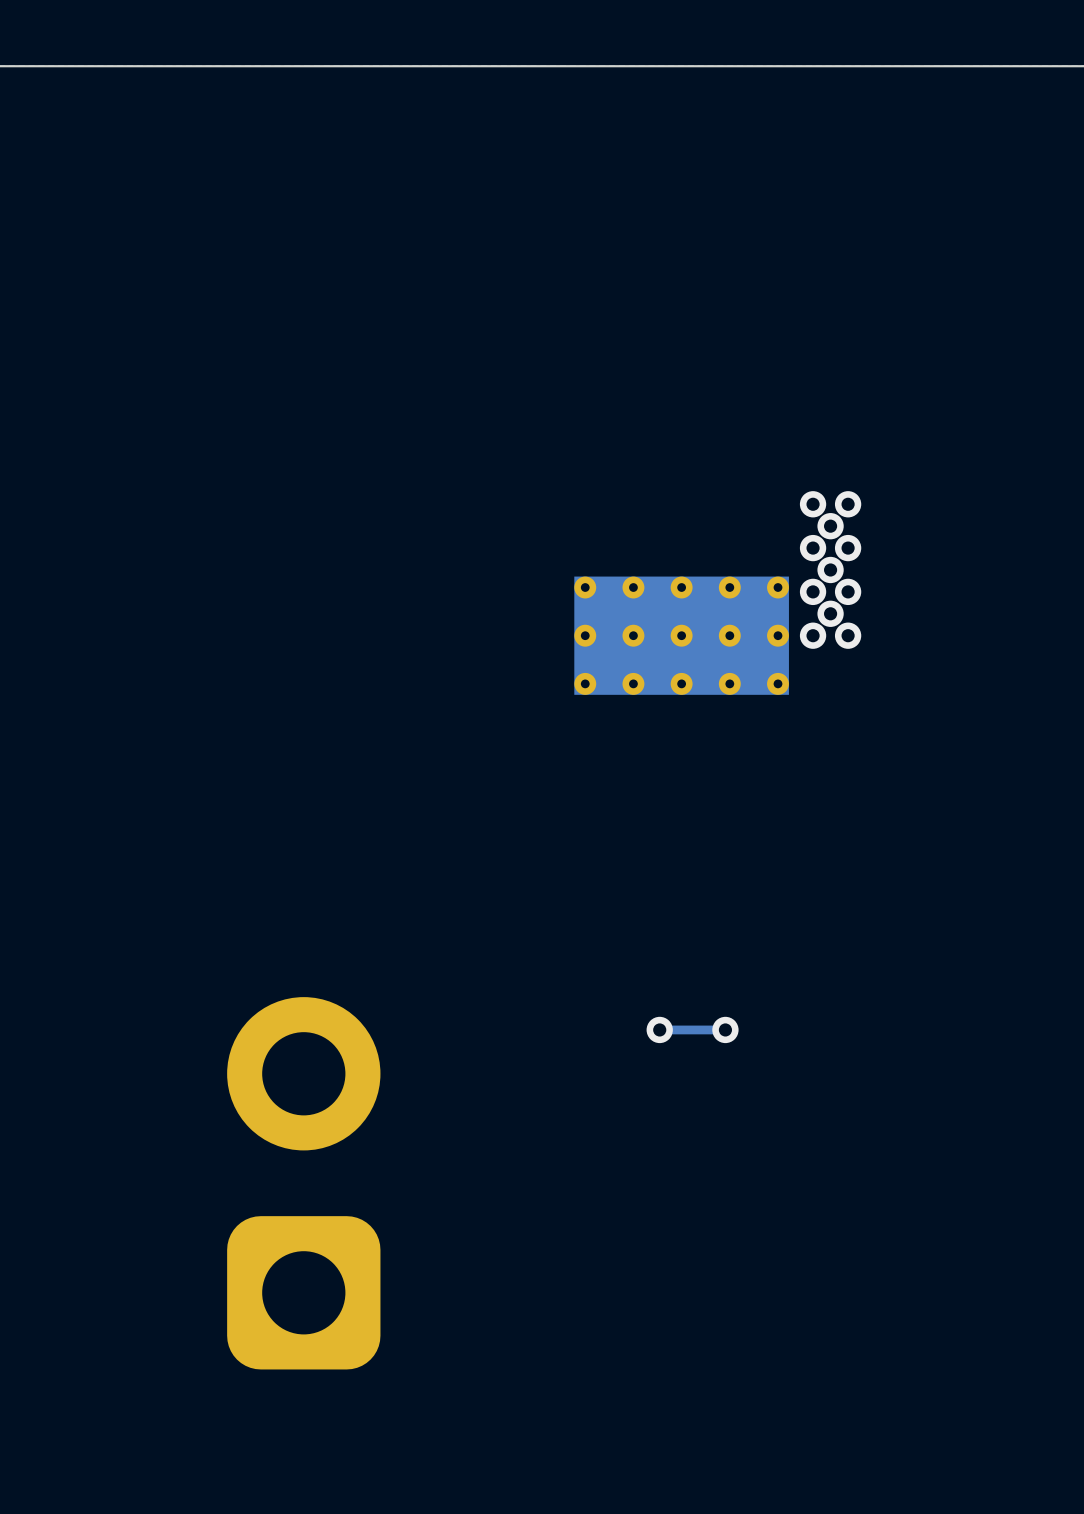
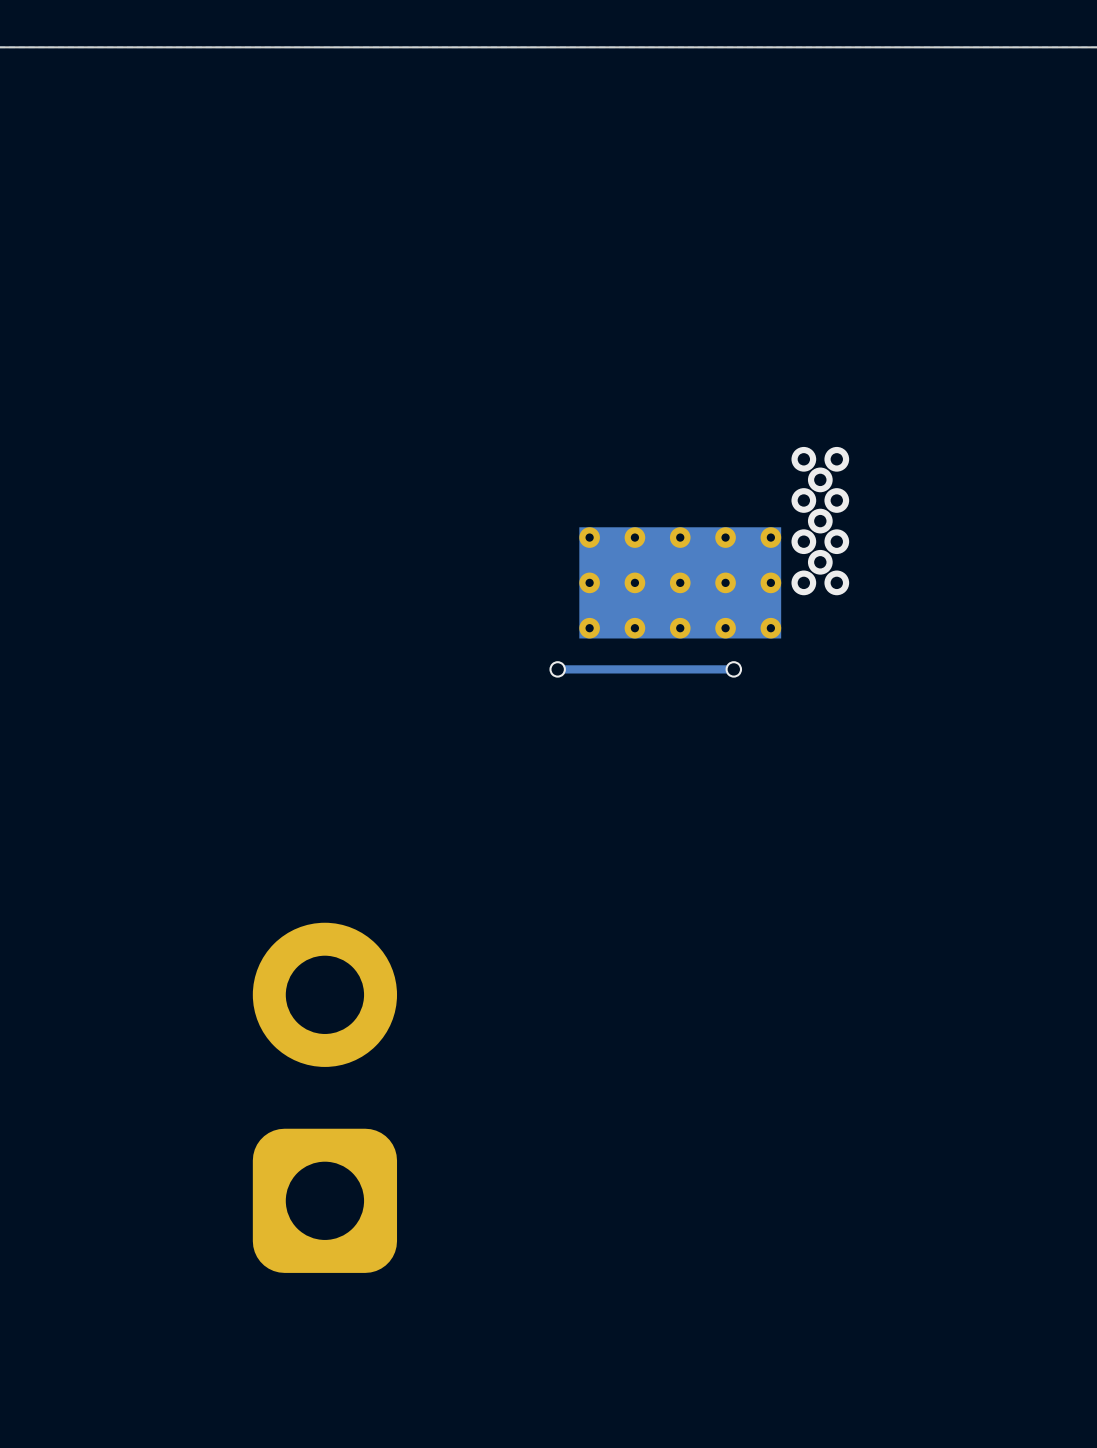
via: none -> (557, 669)
track: none -> (733, 669) (557, 669)
via: none -> (733, 669)
via: (659, 1029) -> none
track: (725, 1029) (659, 1029) -> none
via: (725, 1029) -> none

